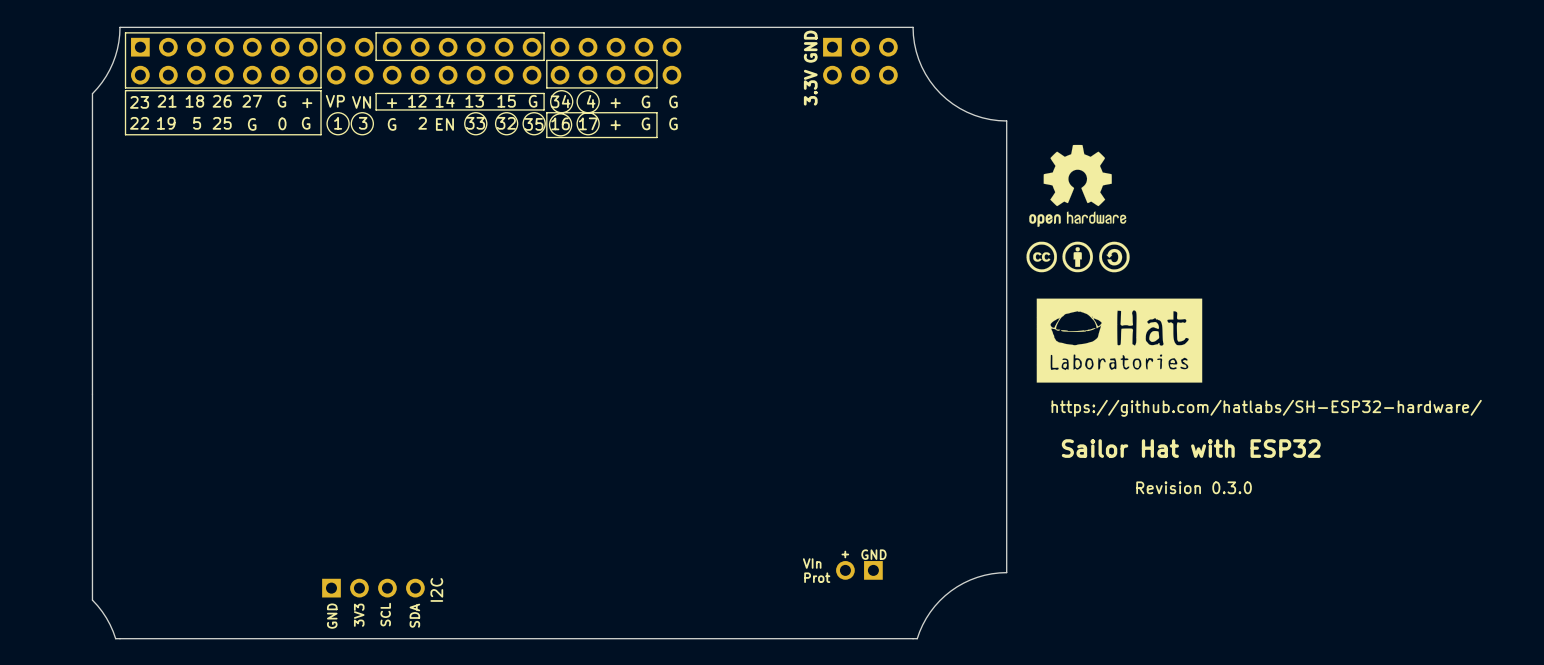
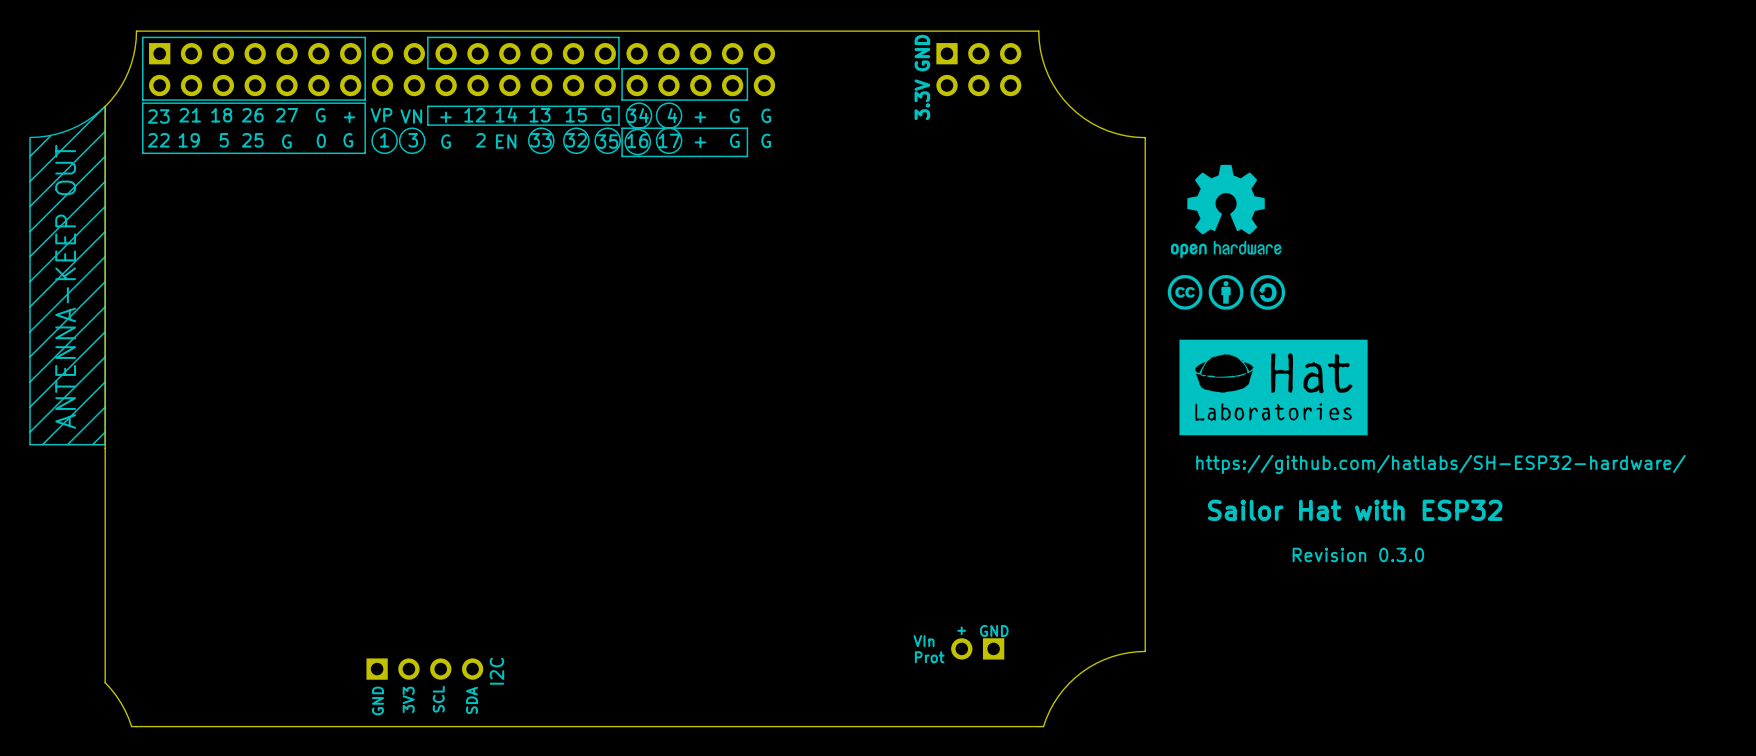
line: none -> (105, 106) (30, 181)
line: none -> (105, 106) (105, 444) (30, 444) (30, 138)
line: none -> (105, 106) (92, 117) (70, 129) (46, 136) (30, 137)
line: none -> (105, 131) (30, 206)
line: none -> (50, 135) (30, 156)
line: none -> (105, 156) (30, 231)
line: none -> (105, 181) (30, 256)
line: none -> (105, 206) (30, 281)
line: none -> (105, 231) (30, 306)
line: none -> (105, 256) (30, 331)
line: none -> (105, 281) (30, 356)
text: none -> ANTENNA-KEEP OUT (65, 286)
line: none -> (105, 306) (30, 381)
line: none -> (105, 331) (30, 407)
line: none -> (105, 356) (30, 432)
line: none -> (105, 381) (42, 444)
line: none -> (105, 407) (67, 444)
line: none -> (105, 432) (92, 444)

